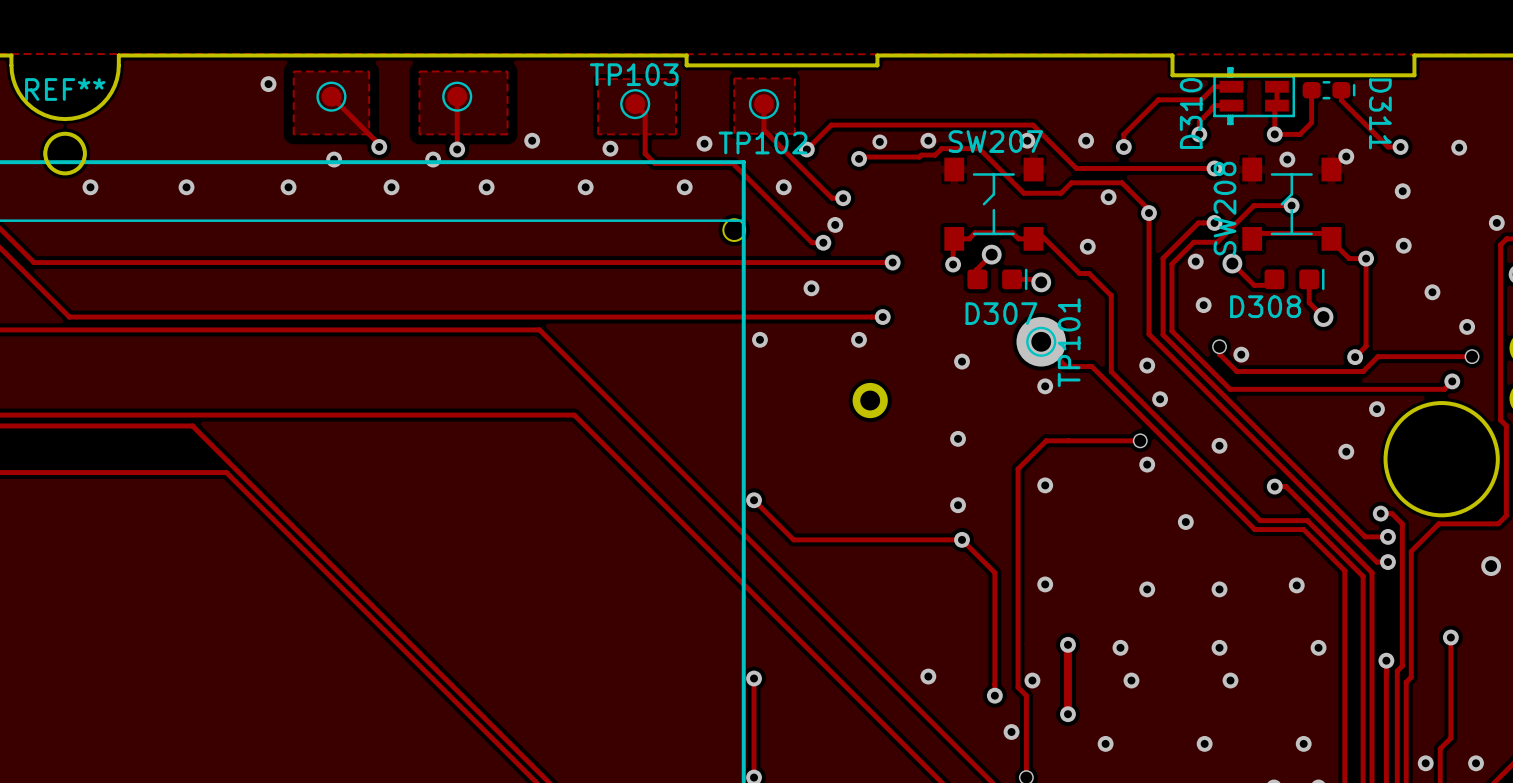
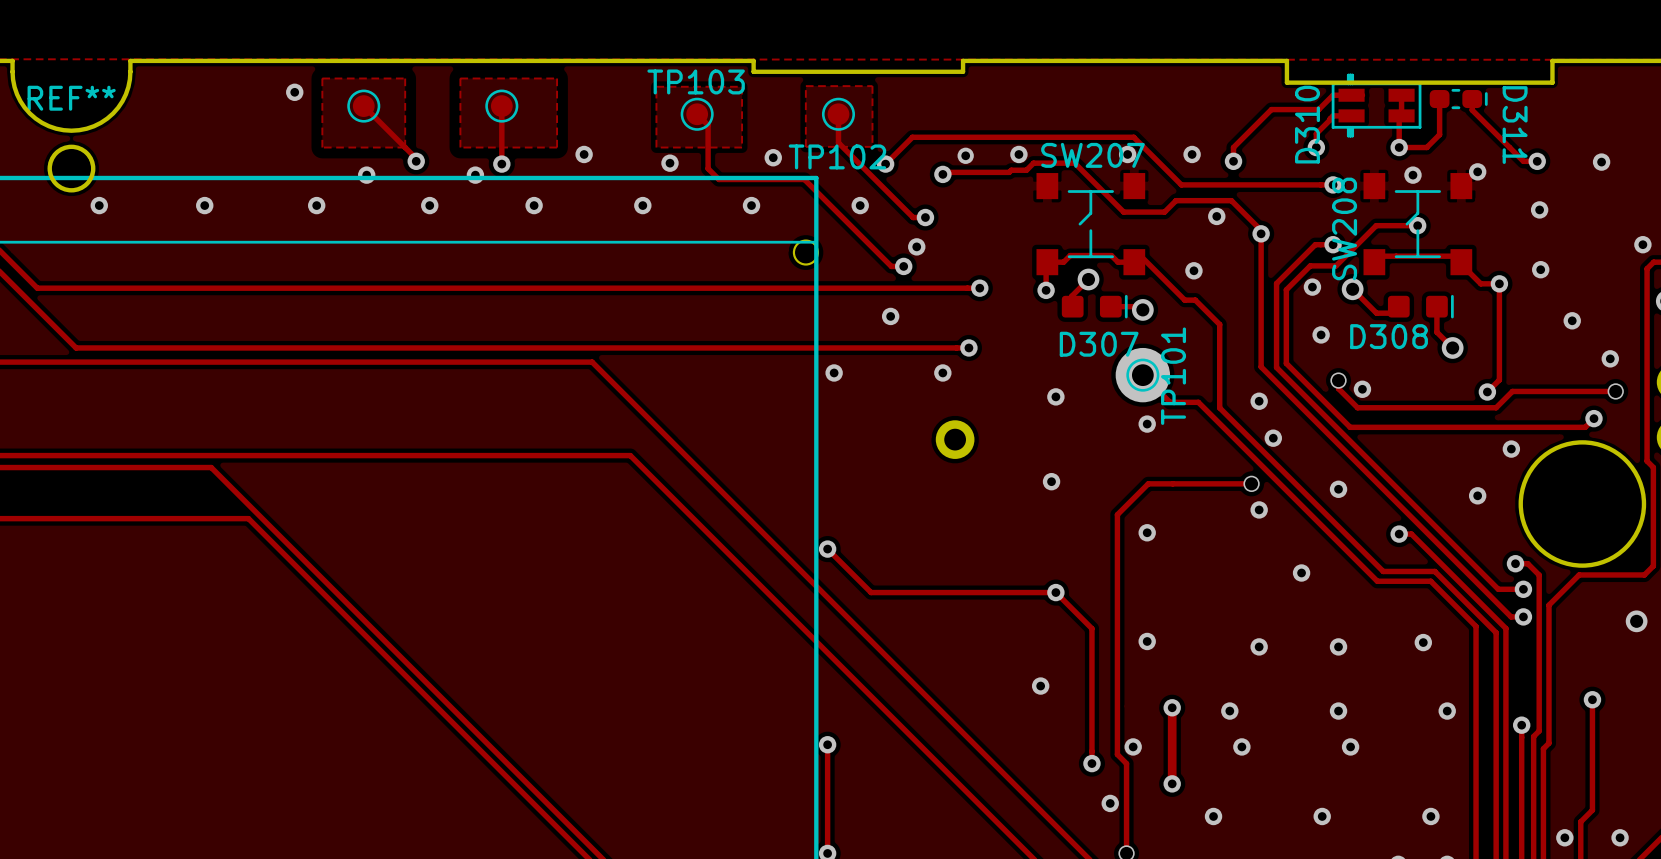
via: (958, 505) -> none
via position: (928, 676) -> (1040, 686)

